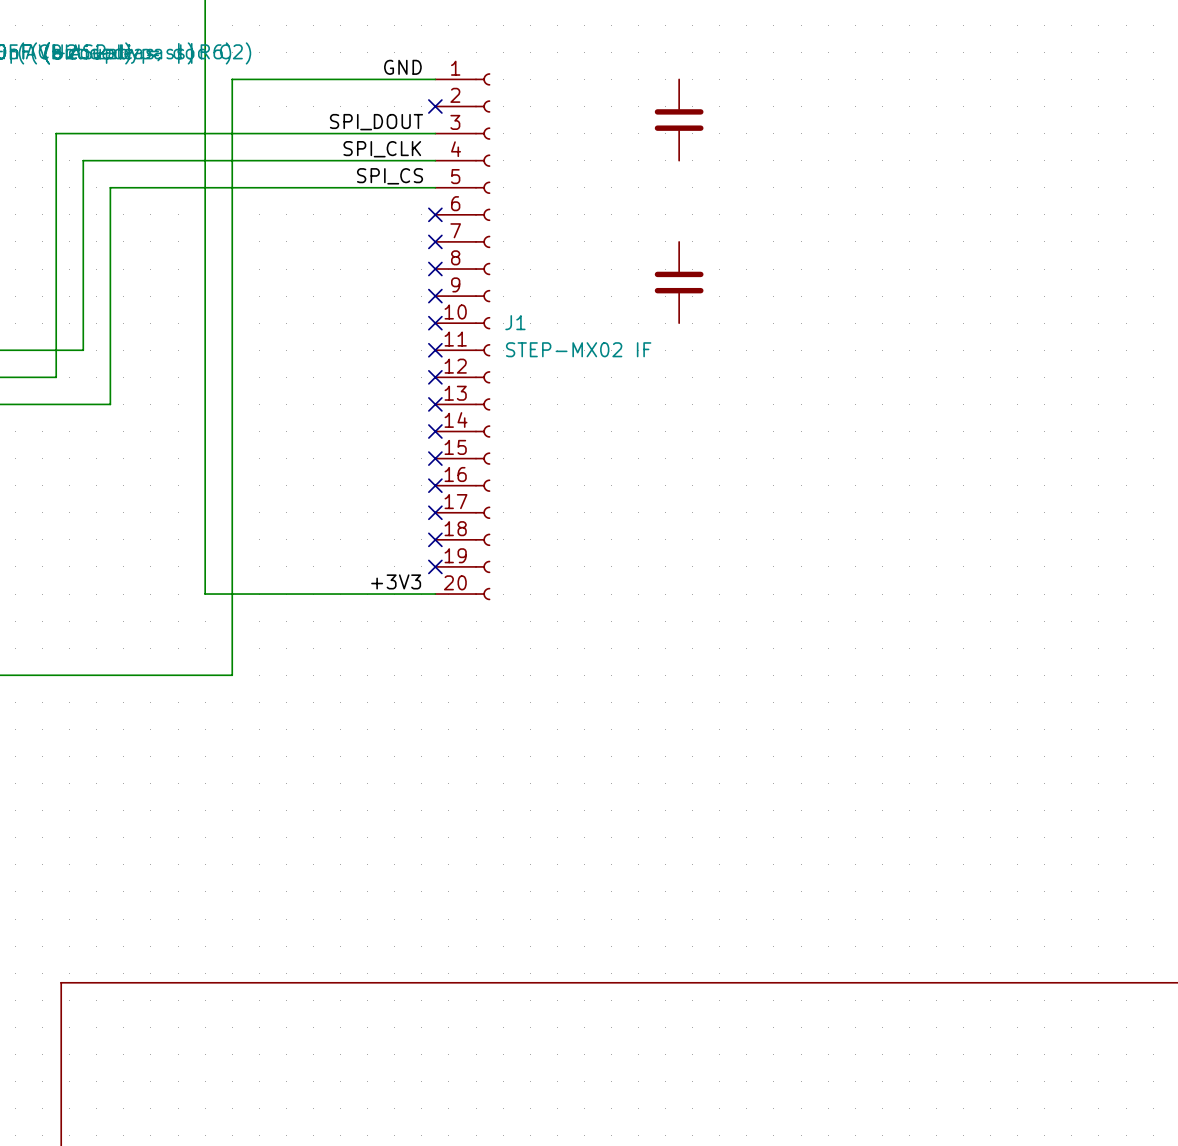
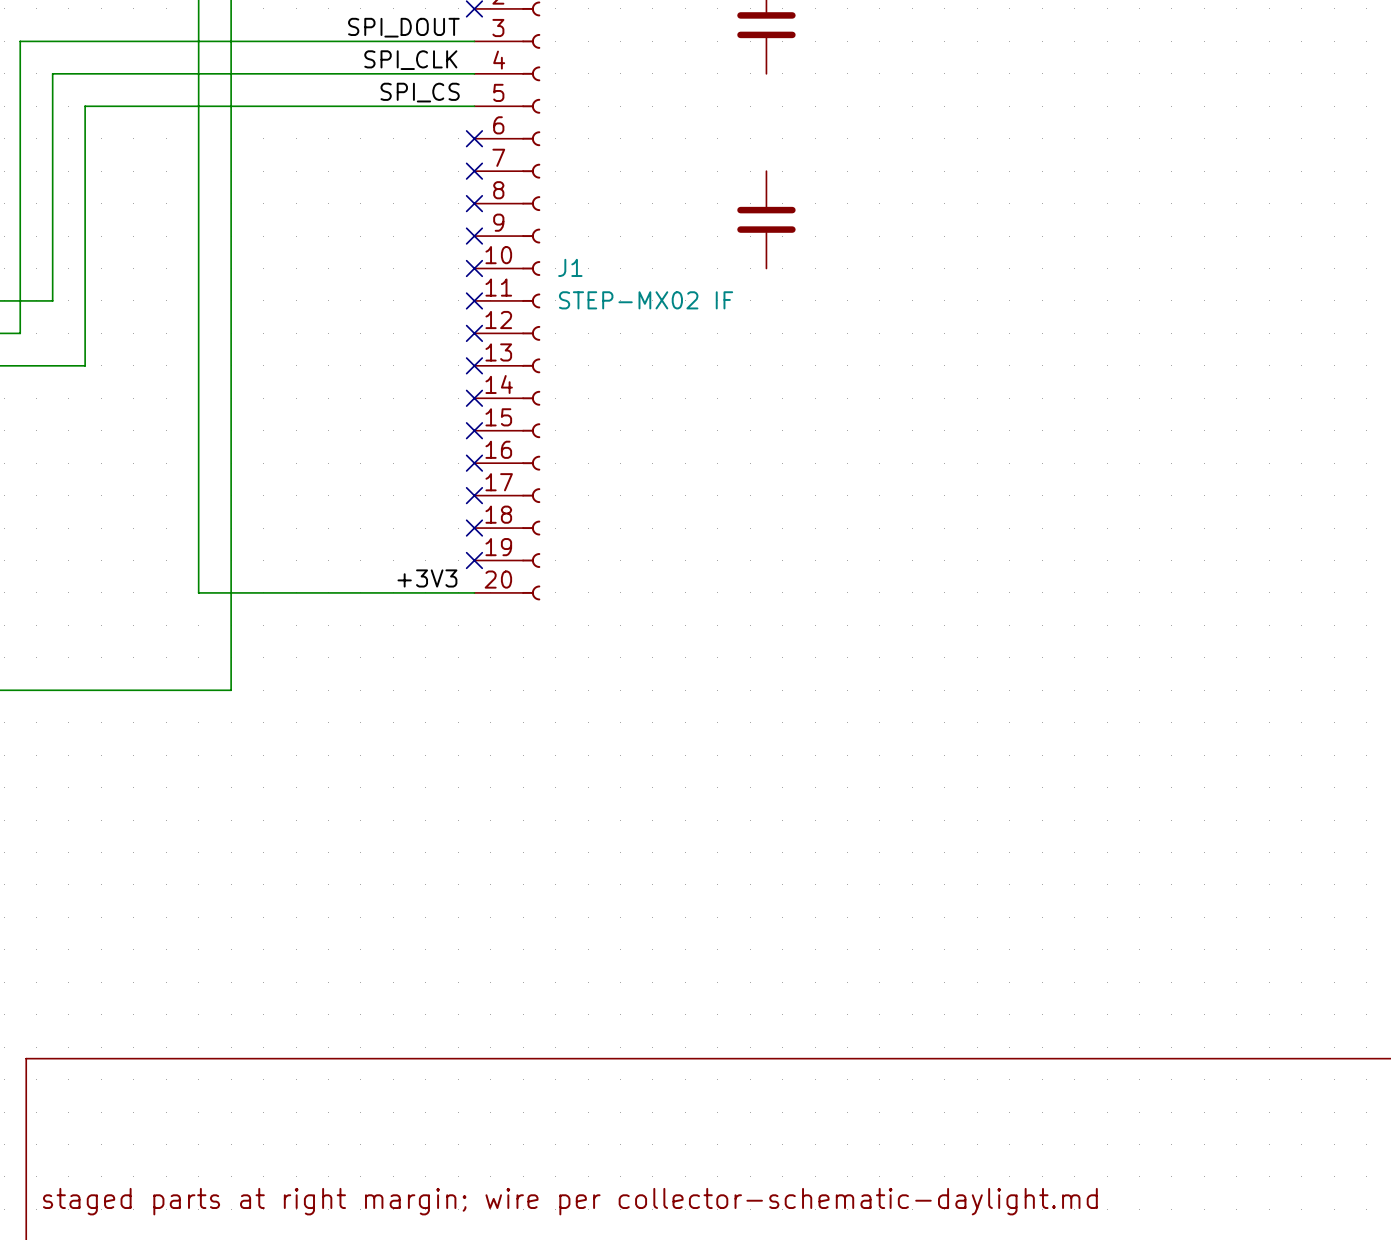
title block: none -> staged parts at right margin; wire per collector-schematic-daylight.md (570, 1201)

